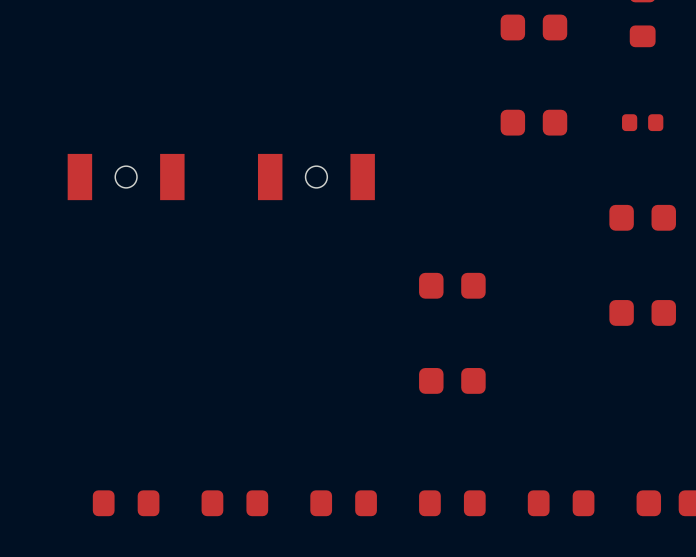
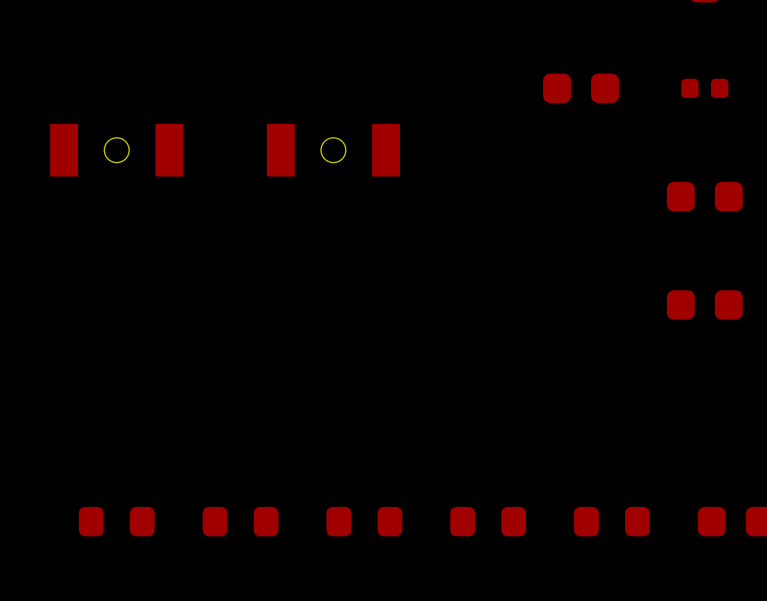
part: (452, 285) -> none
part: (452, 380) -> none

